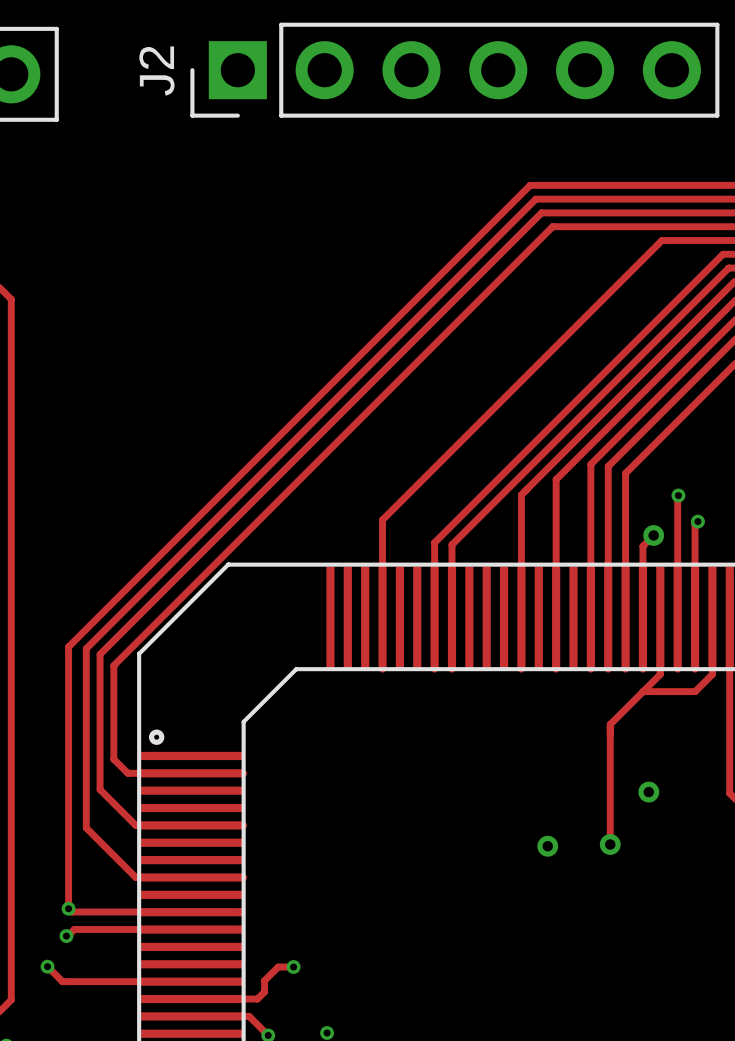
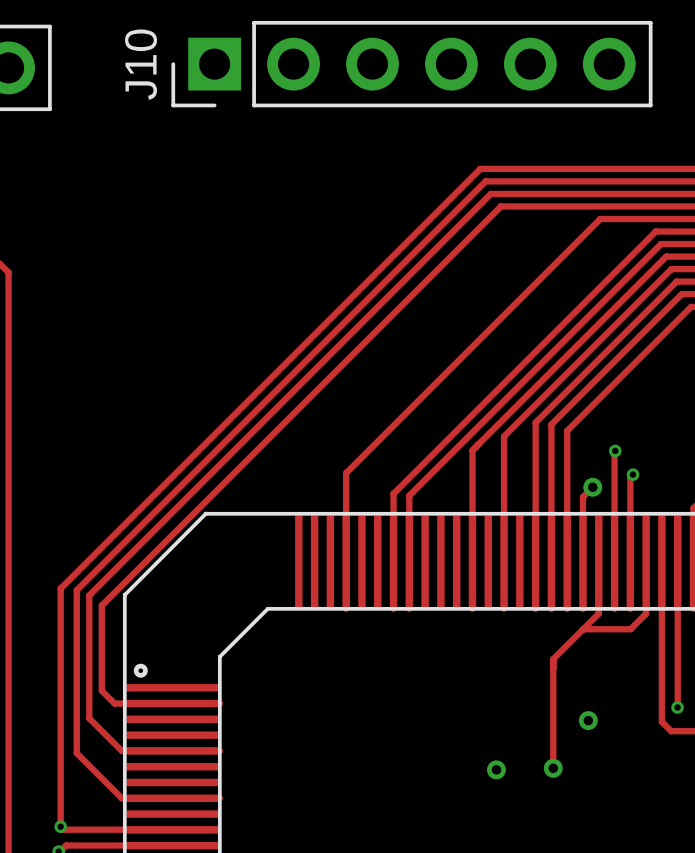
J2 name: J2 (156, 71) -> J10 (141, 64)

